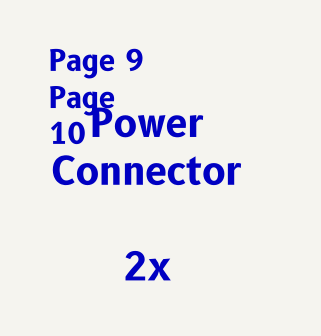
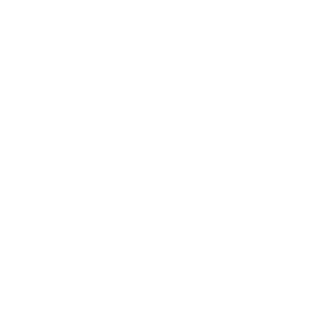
text: Page 9 (96, 63) -> none
text: Page (82, 100) -> none
text: Power (147, 122) -> none
text: 10 (67, 132) -> none
text: Connector (146, 170) -> none
text: 2x (148, 265) -> none

